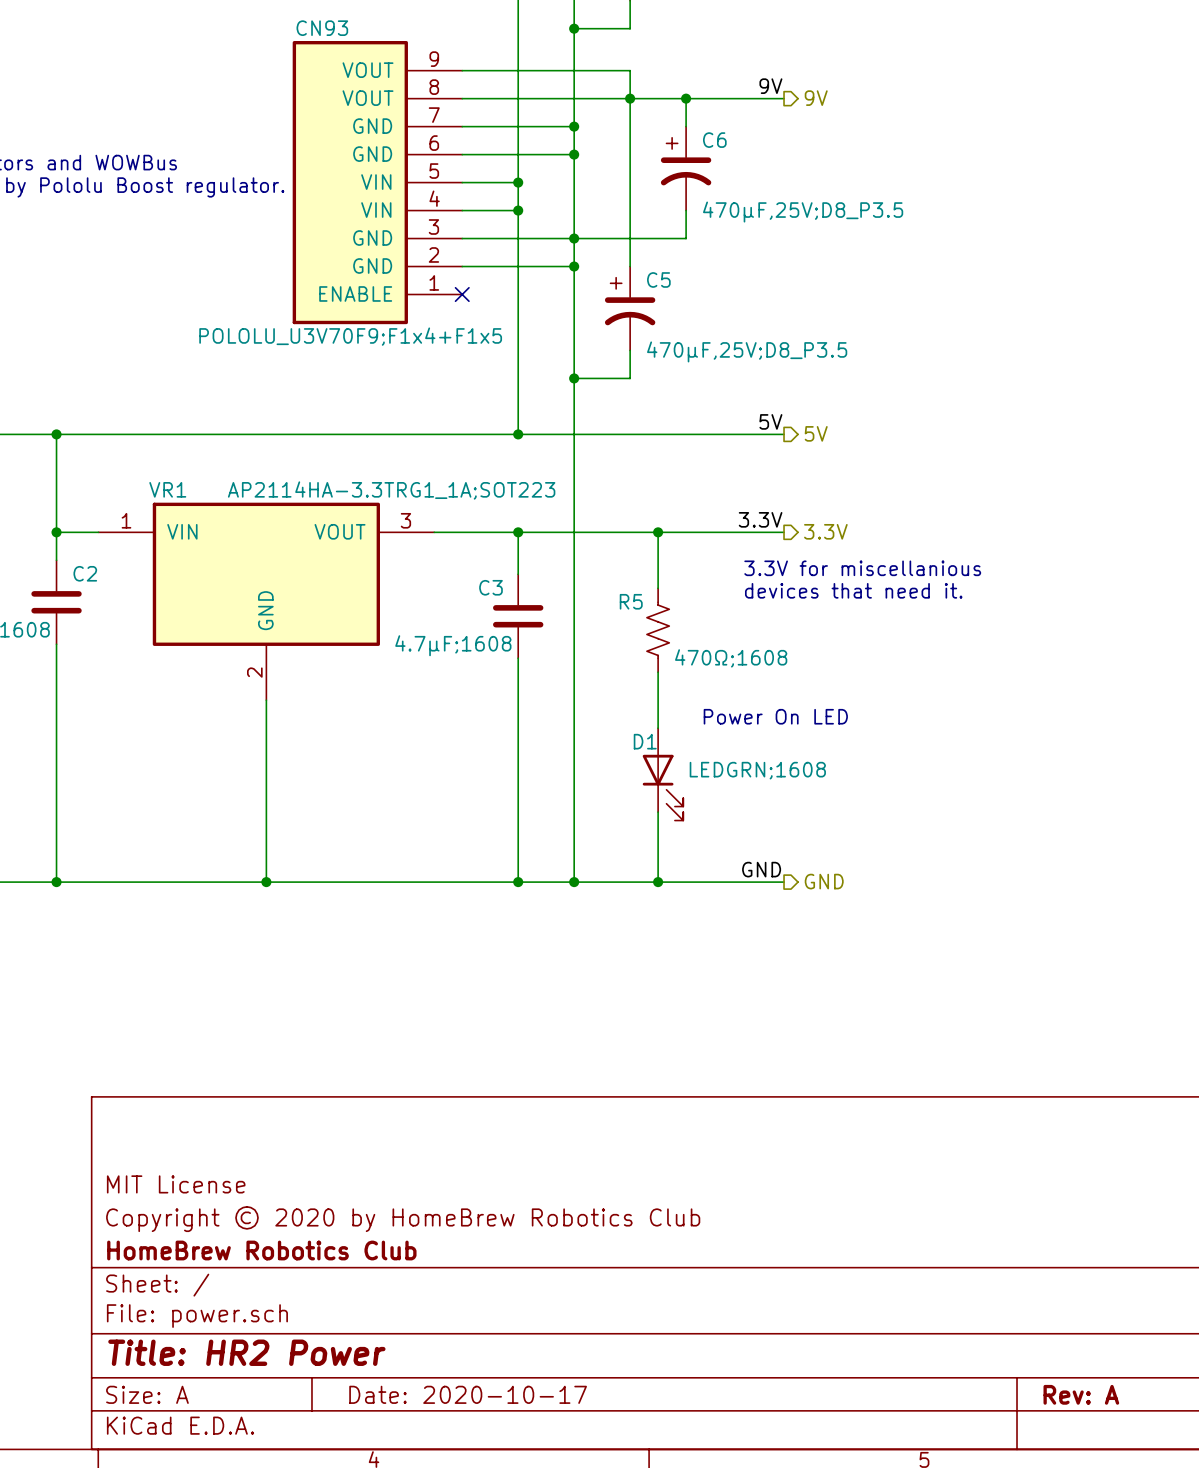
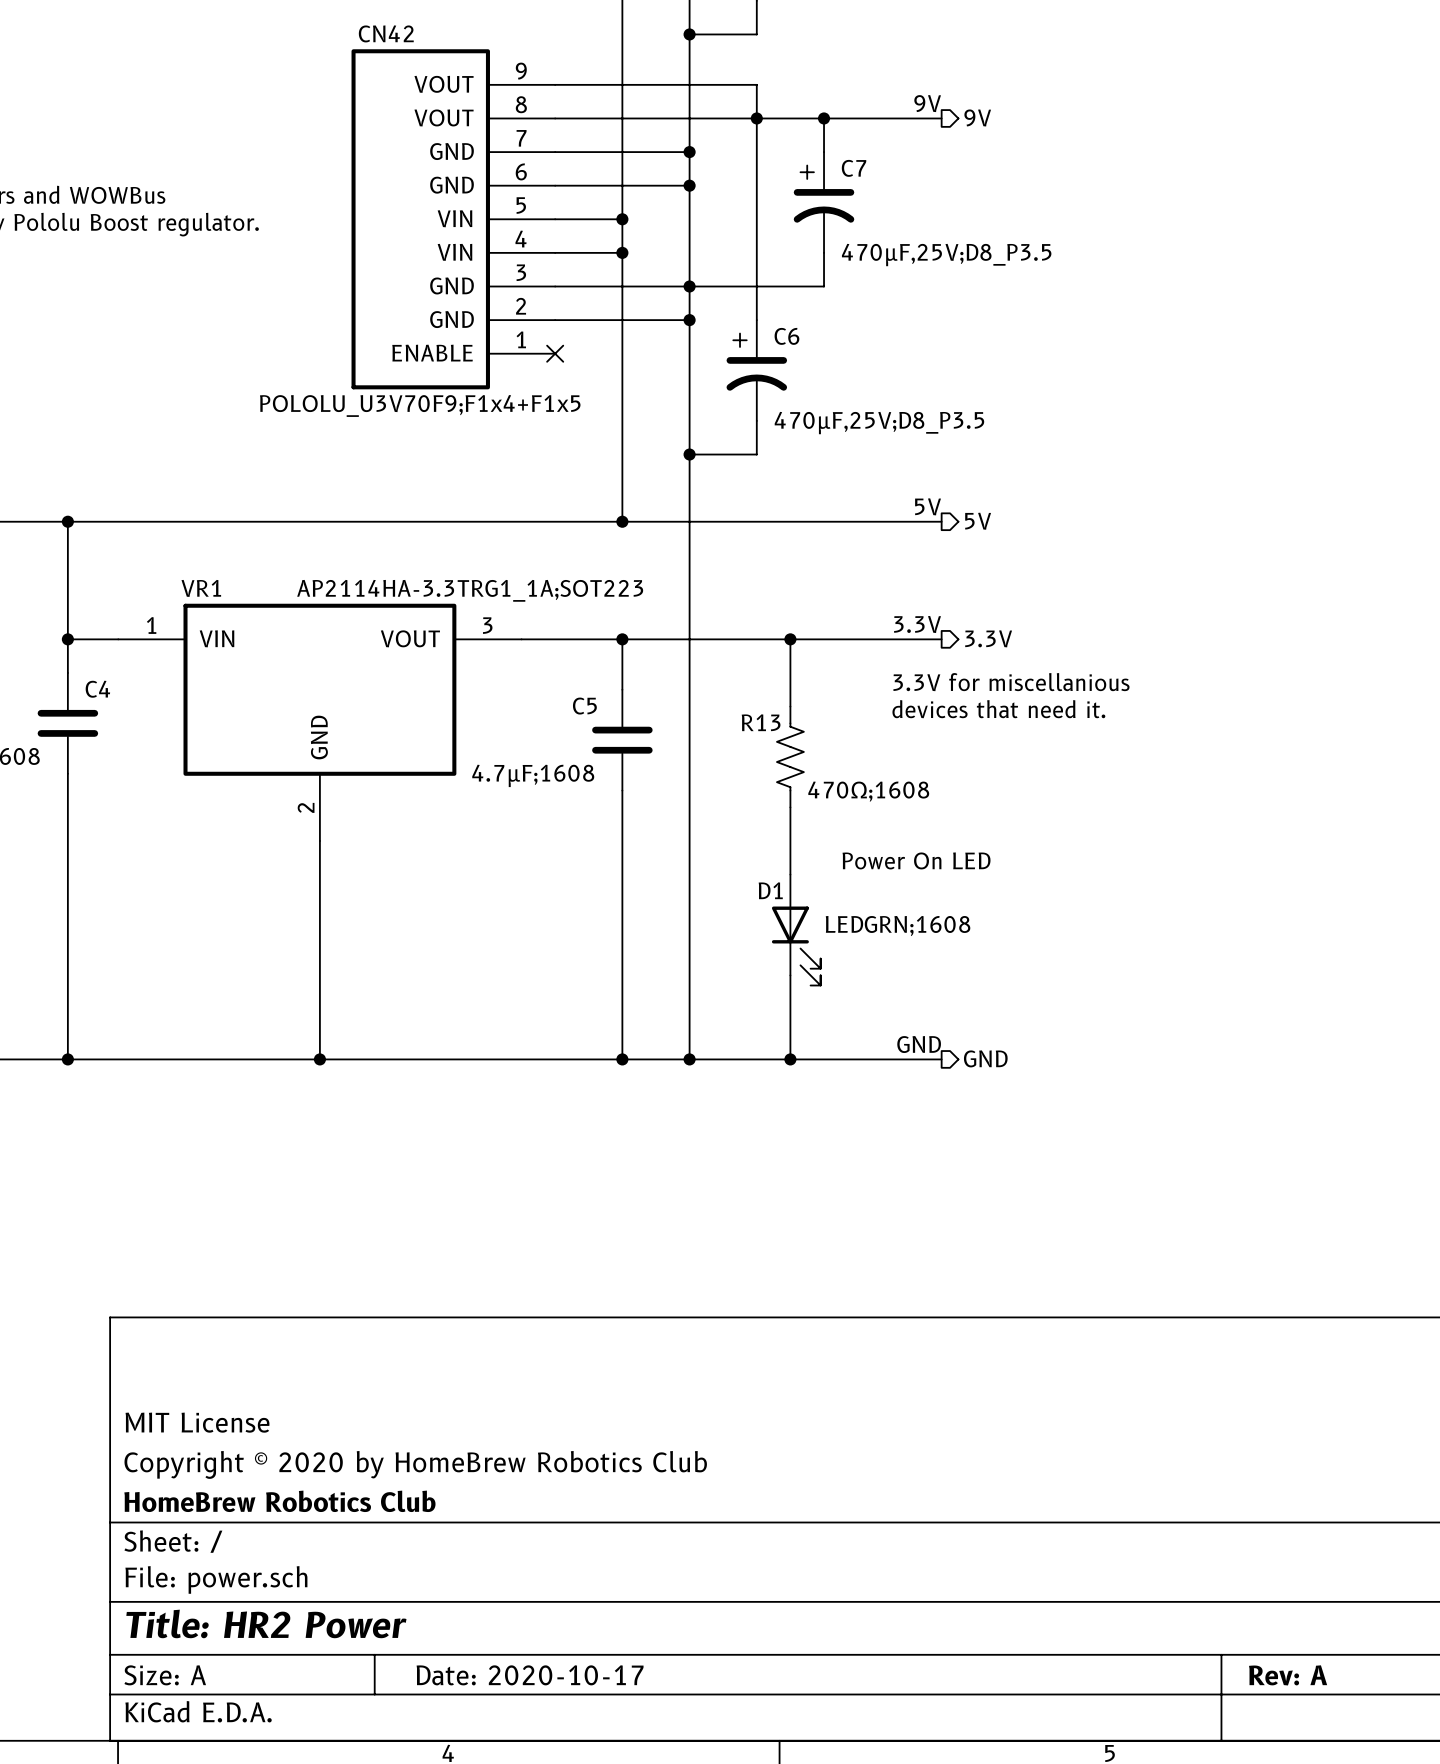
CN93 name: CN93 (322, 28) -> CN42 (386, 33)
C6 name: C6 (714, 140) -> C7 (854, 168)
C5 name: C5 (658, 279) -> C6 (786, 336)
C2 name: C2 (85, 573) -> C4 (97, 689)
C3 name: C3 (490, 587) -> C5 (584, 706)
R5 name: R5 (631, 601) -> R13 (761, 722)

